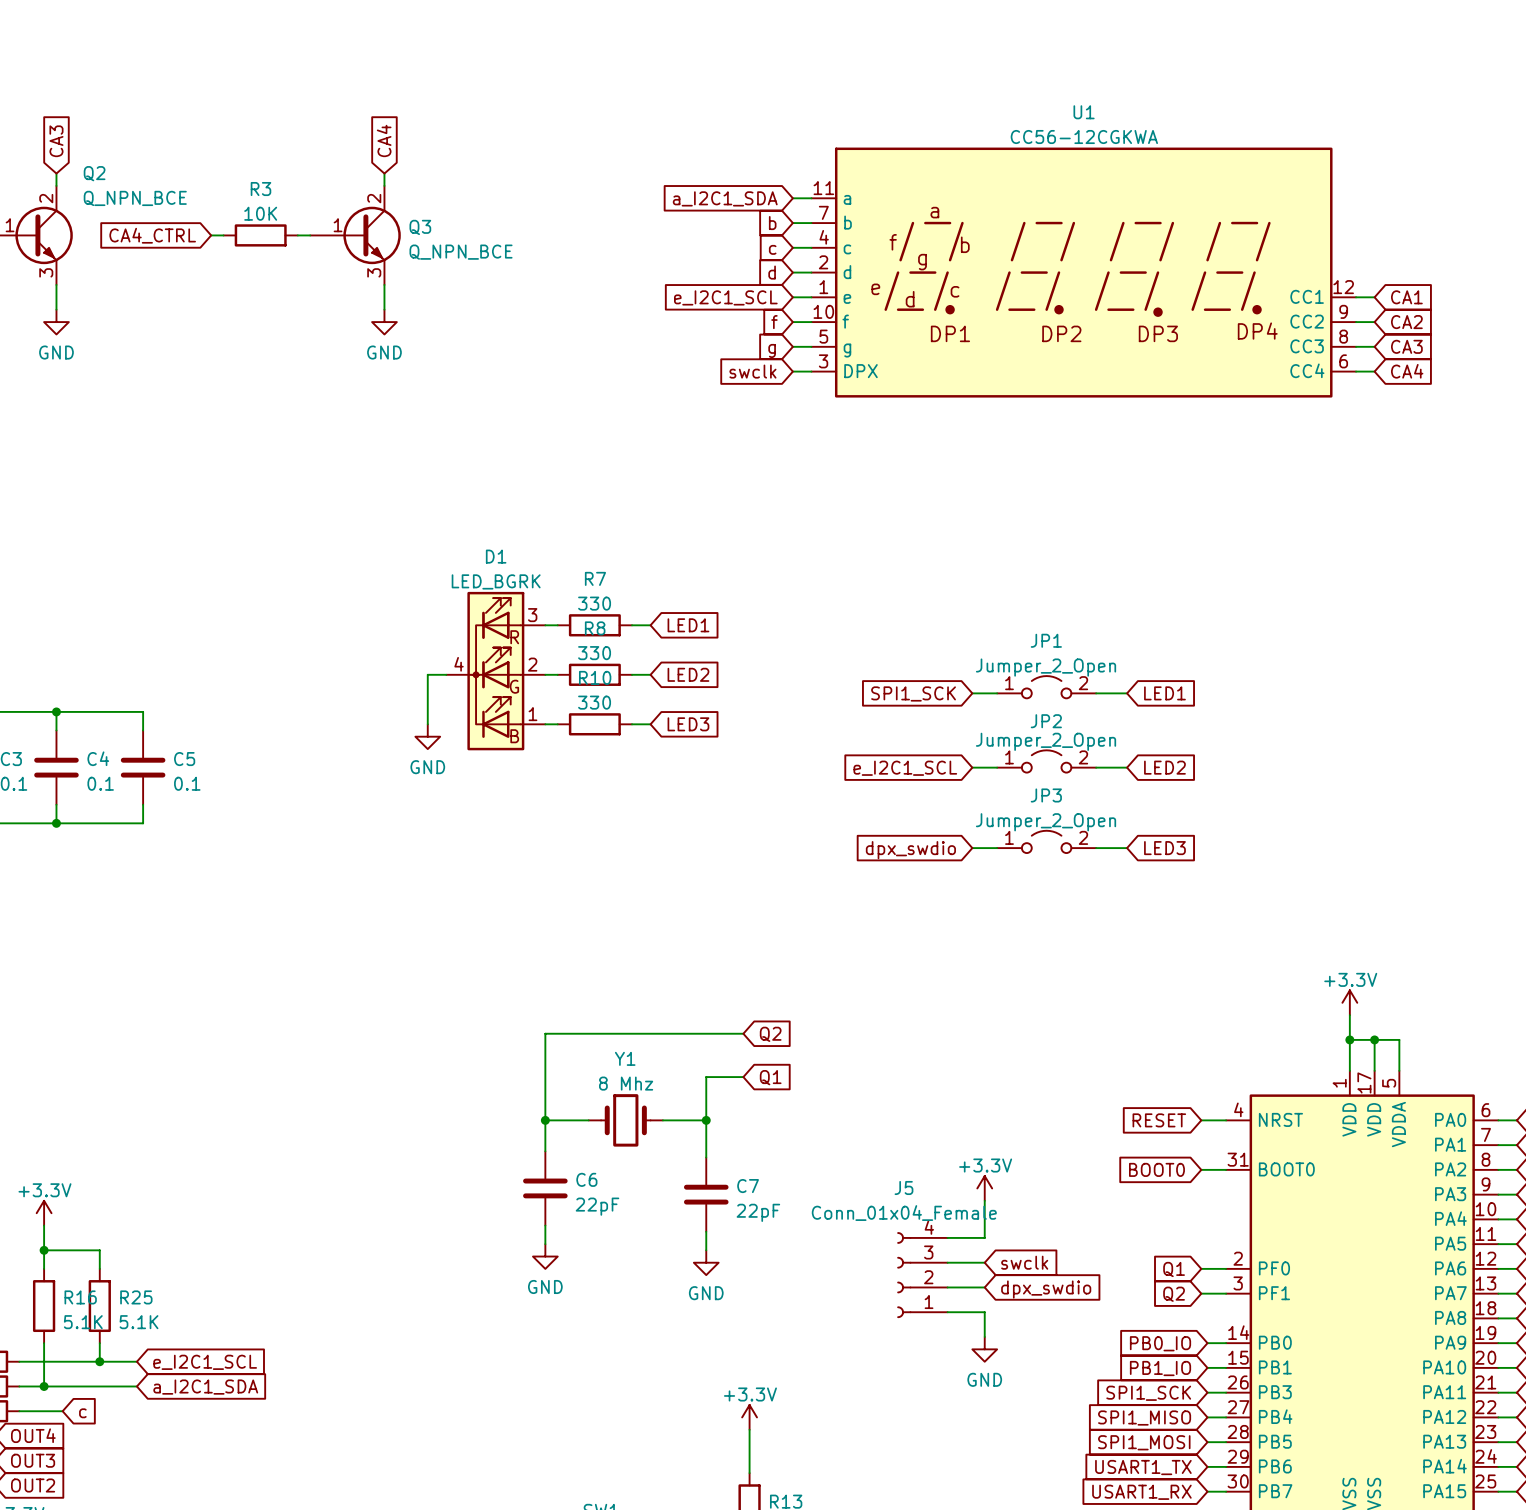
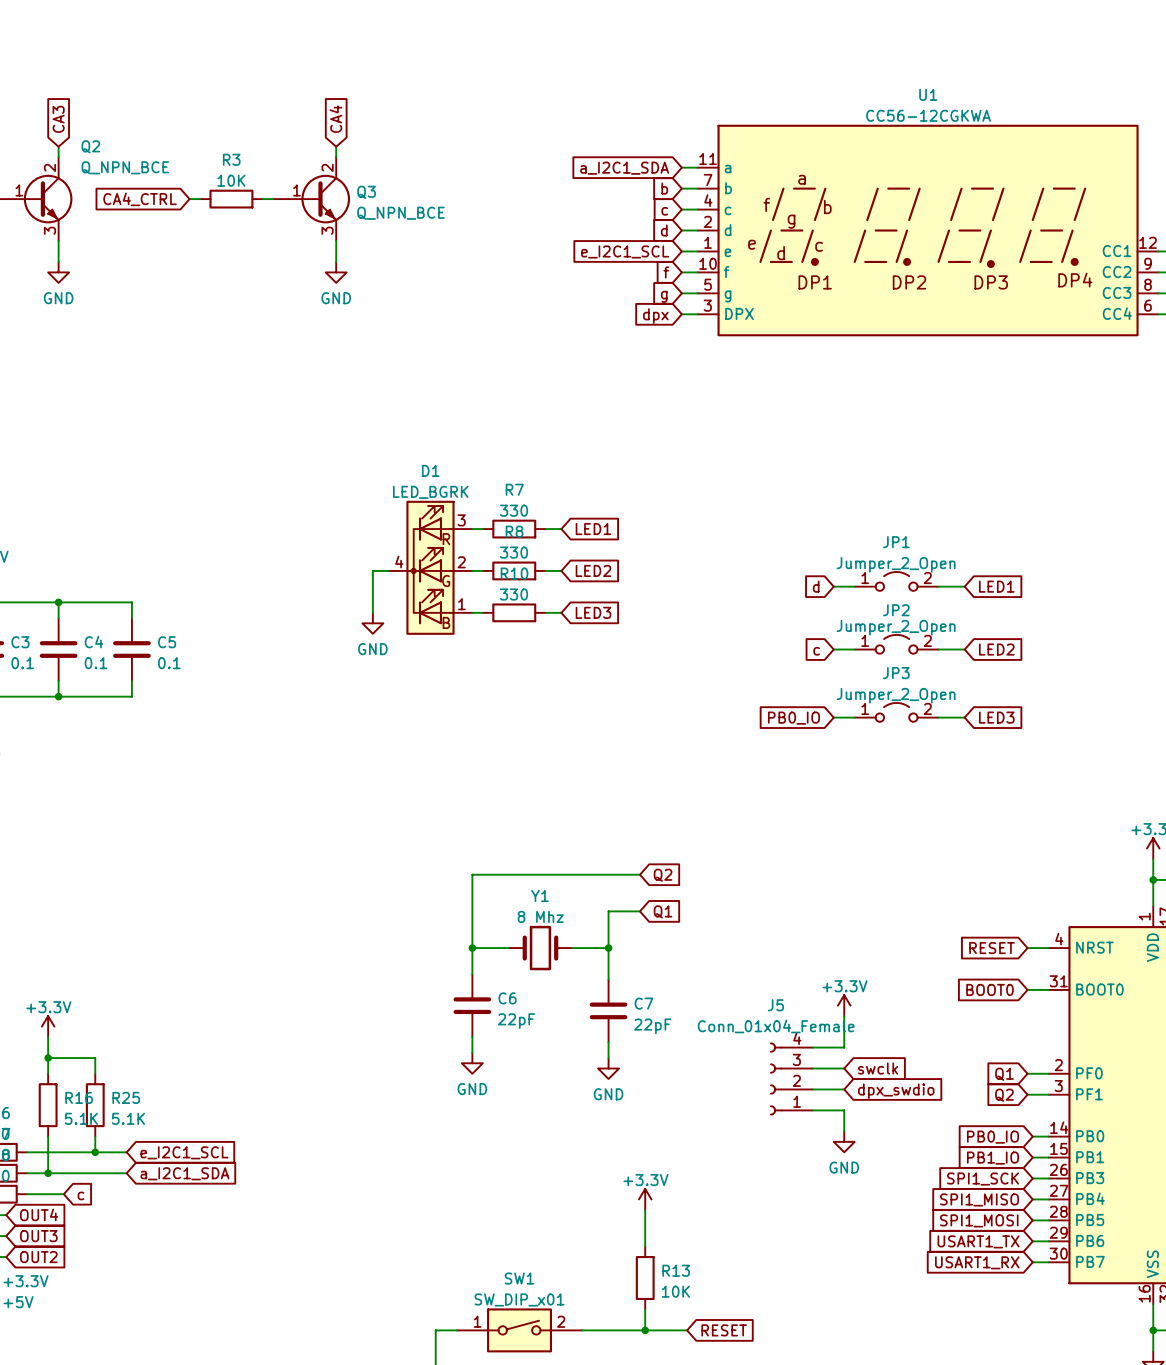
global label: swclk (752, 371) -> dpx (655, 316)
global label: SPI1_SCK (913, 693) -> d (816, 586)
global label: e_I2C1_SCL (905, 768) -> c (816, 651)
global label: dpx_swdio (910, 850) -> PB0_IO (793, 718)

